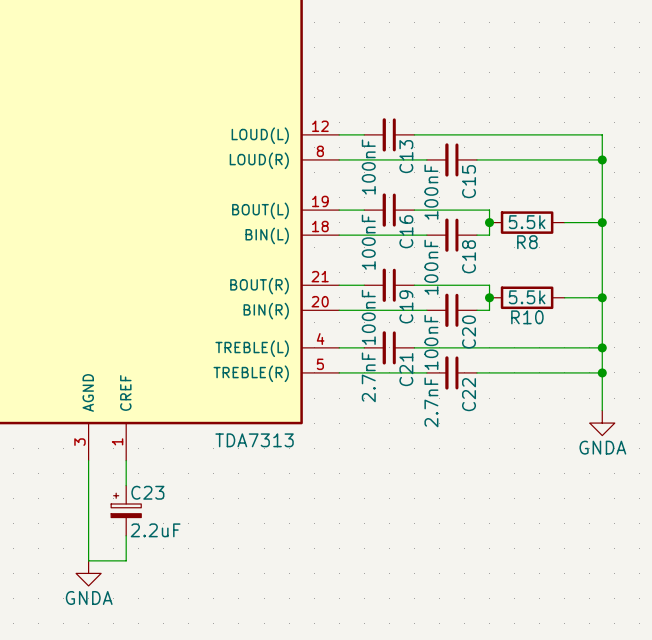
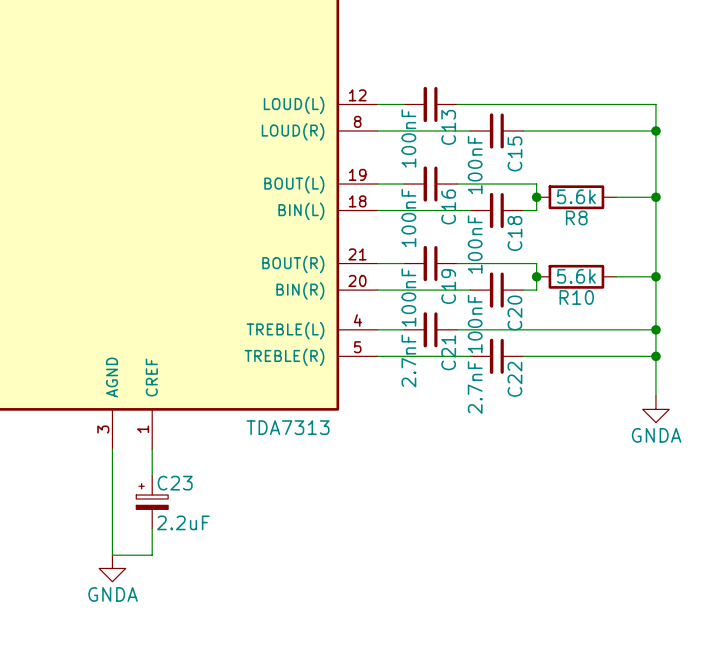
R8 value: 5.5k (527, 222) -> 5.6k (576, 196)
R10 value: 5.5k (527, 297) -> 5.6k (576, 276)

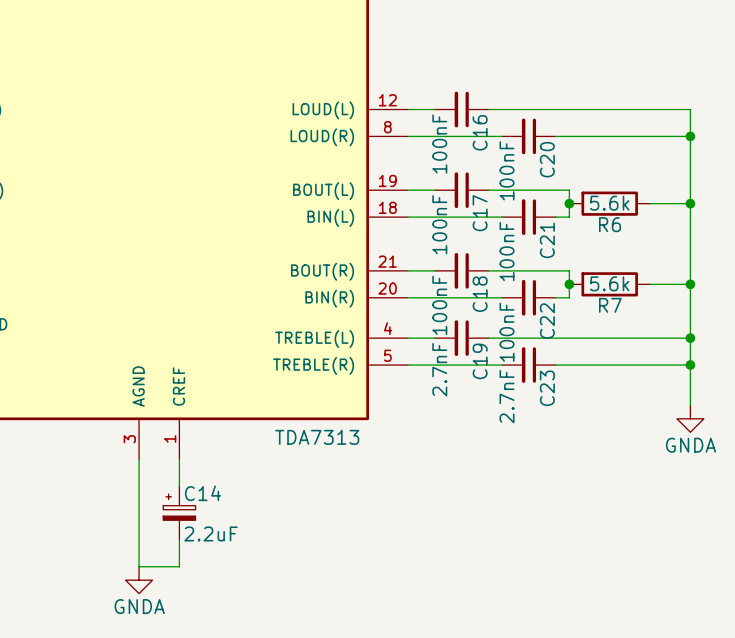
C13 name: C13 (448, 127) -> C16 (480, 132)
C15 name: C15 (514, 153) -> C20 (547, 159)
C16 name: C16 (448, 206) -> C17 (480, 213)
R8 name: R8 (576, 217) -> R6 (610, 224)
C18 name: C18 (514, 233) -> C21 (547, 240)
C19 name: C19 (448, 286) -> C18 (480, 294)
R10 name: R10 (576, 297) -> R7 (610, 305)
C20 name: C20 (514, 313) -> C22 (547, 321)
C21 name: C21 (448, 352) -> C19 (480, 361)
C22 name: C22 (514, 379) -> C23 (547, 388)
C23 name: C23 (175, 483) -> C14 (203, 493)

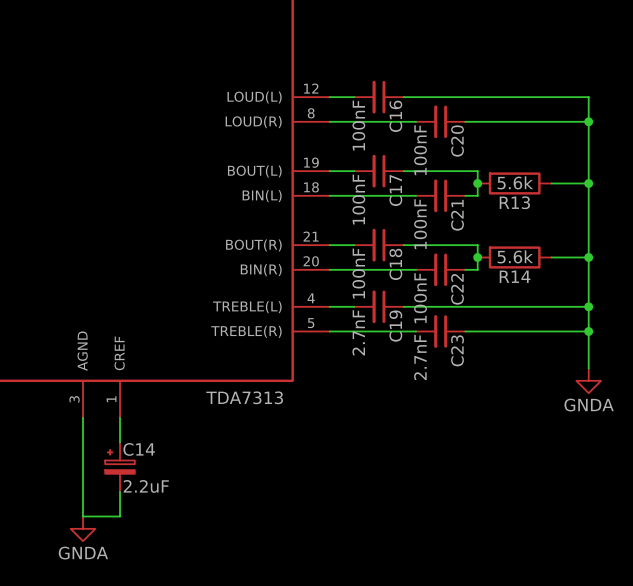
R6 name: R6 (610, 224) -> R13 (514, 202)
R7 name: R7 (610, 305) -> R14 (515, 276)

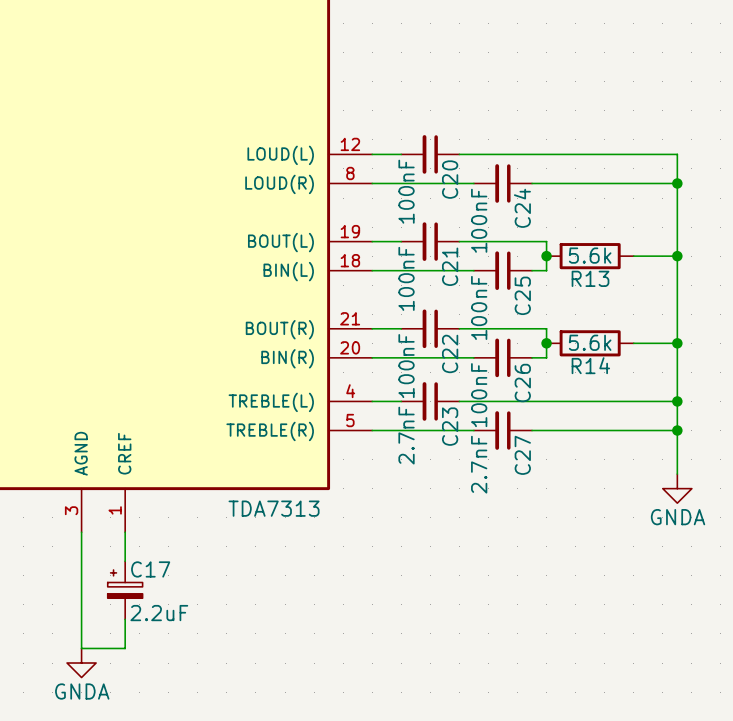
C16 name: C16 (395, 116) -> C20 (450, 179)
C20 name: C20 (457, 141) -> C24 (522, 208)
C17 name: C17 (395, 190) -> C21 (450, 266)
C21 name: C21 (457, 215) -> C25 (522, 295)
C18 name: C18 (395, 264) -> C22 (450, 353)
C22 name: C22 (457, 289) -> C26 (522, 383)
C19 name: C19 (395, 326) -> C23 (450, 426)
C23 name: C23 (457, 350) -> C27 (522, 455)
C14 name: C14 (139, 449) -> C17 (150, 569)

